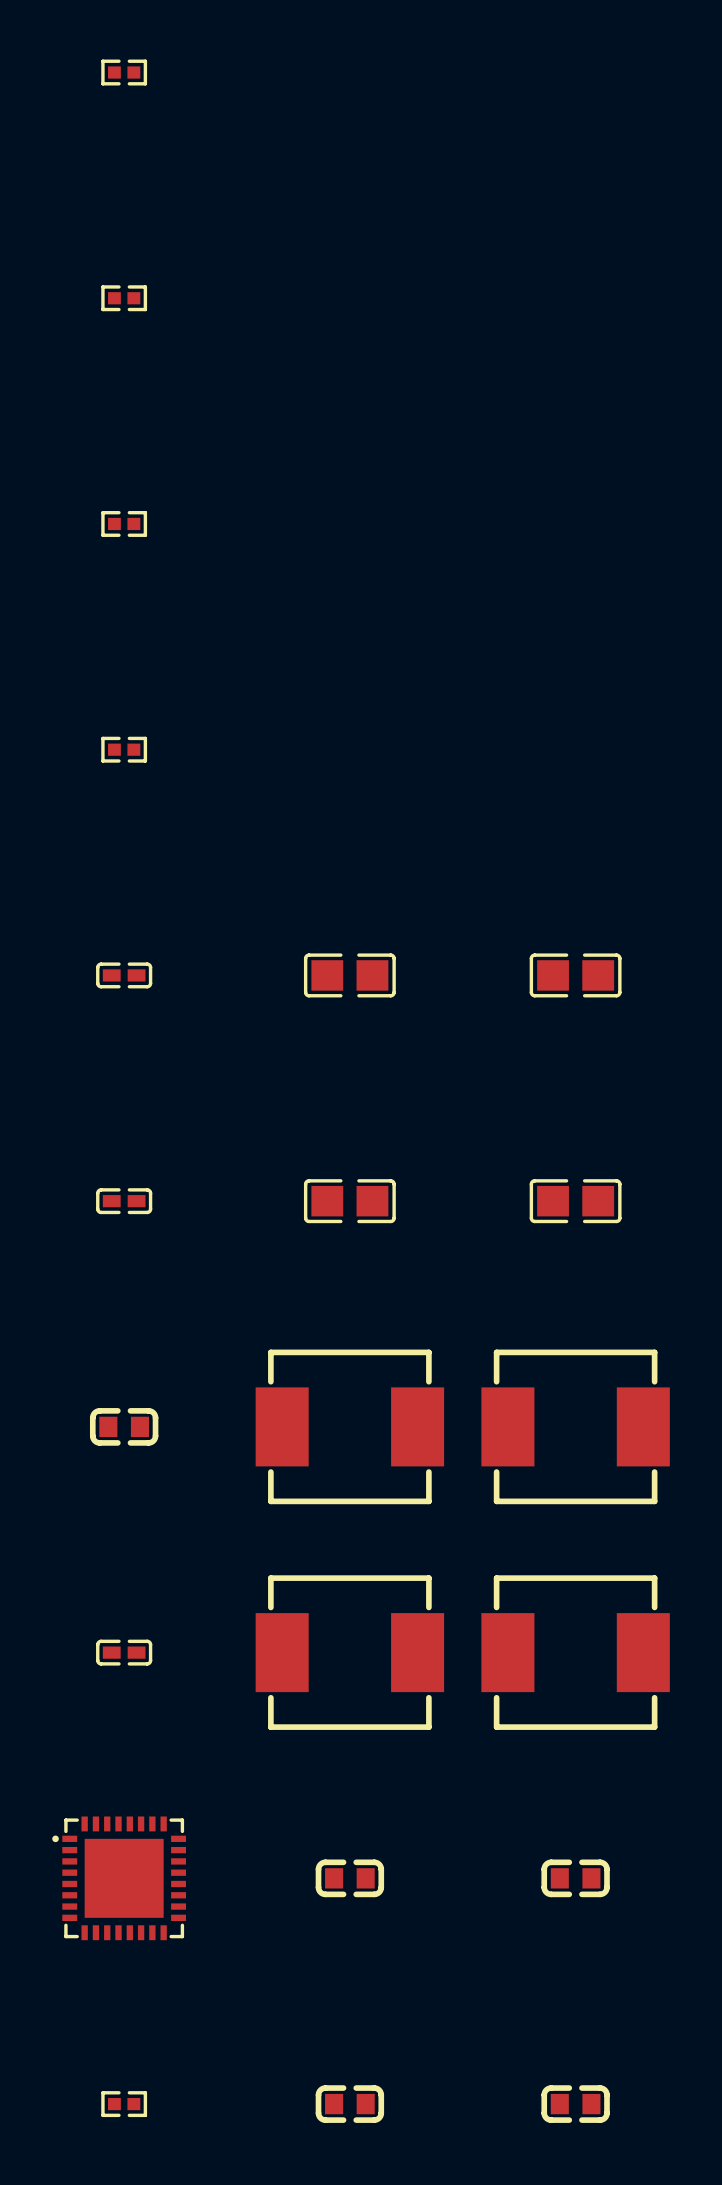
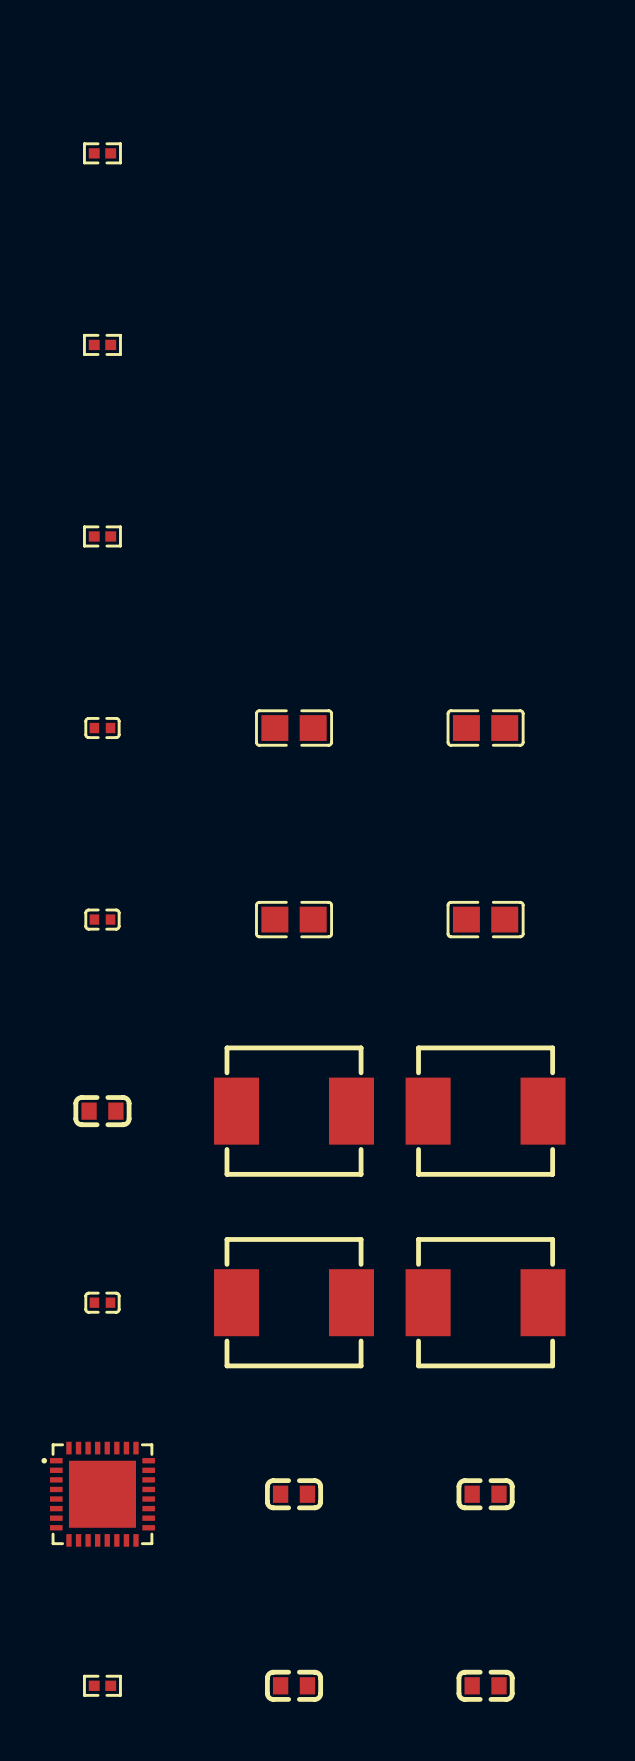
part footprint: [96, 962, 153, 989] -> [84, 717, 121, 740]
part footprint: [96, 1188, 153, 1215] -> [84, 908, 121, 931]
part footprint: [96, 1639, 153, 1666] -> [84, 1291, 121, 1314]

